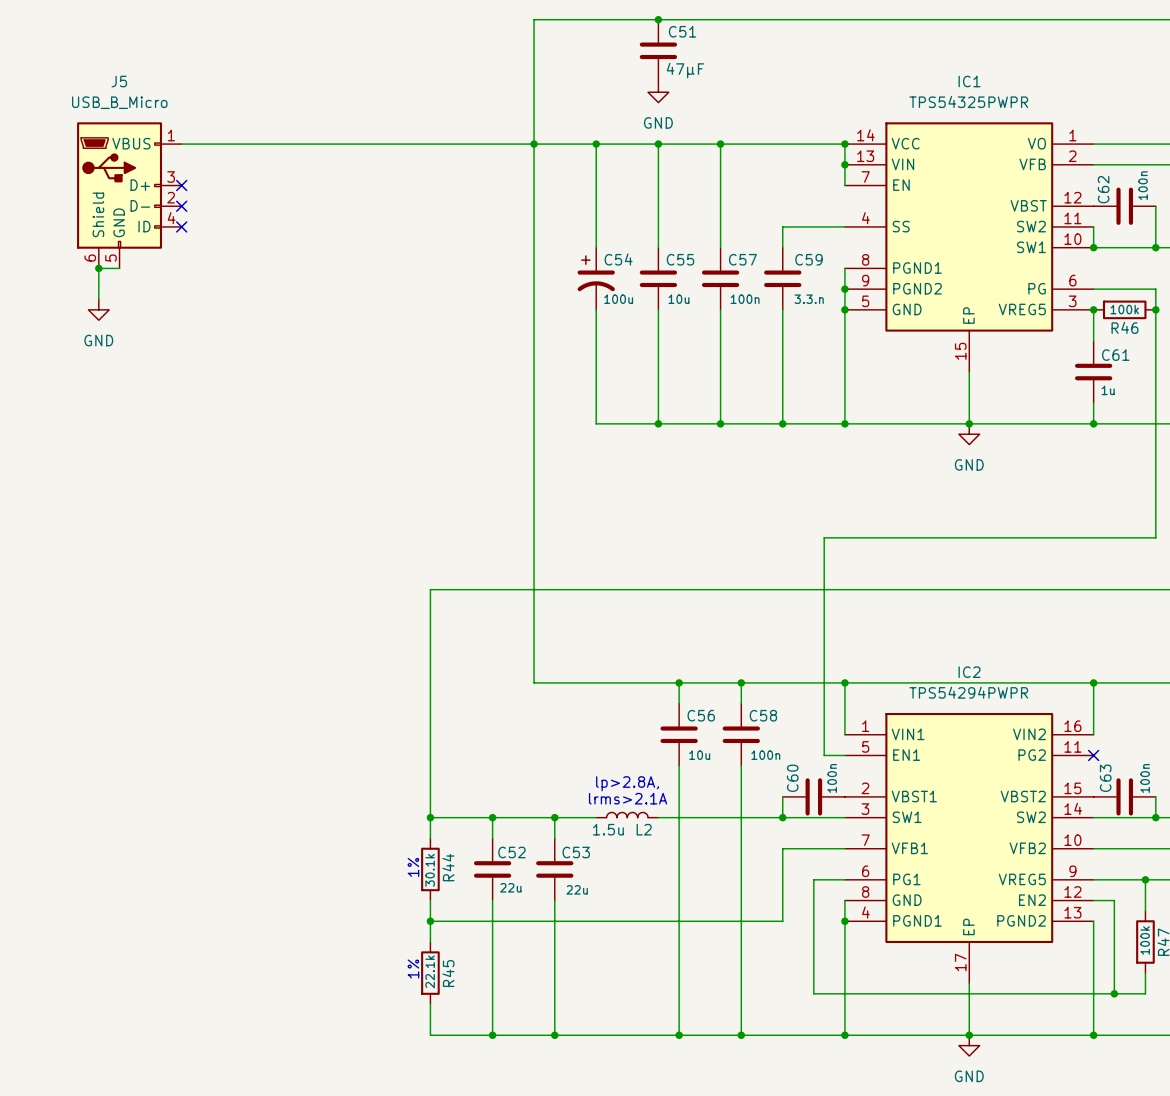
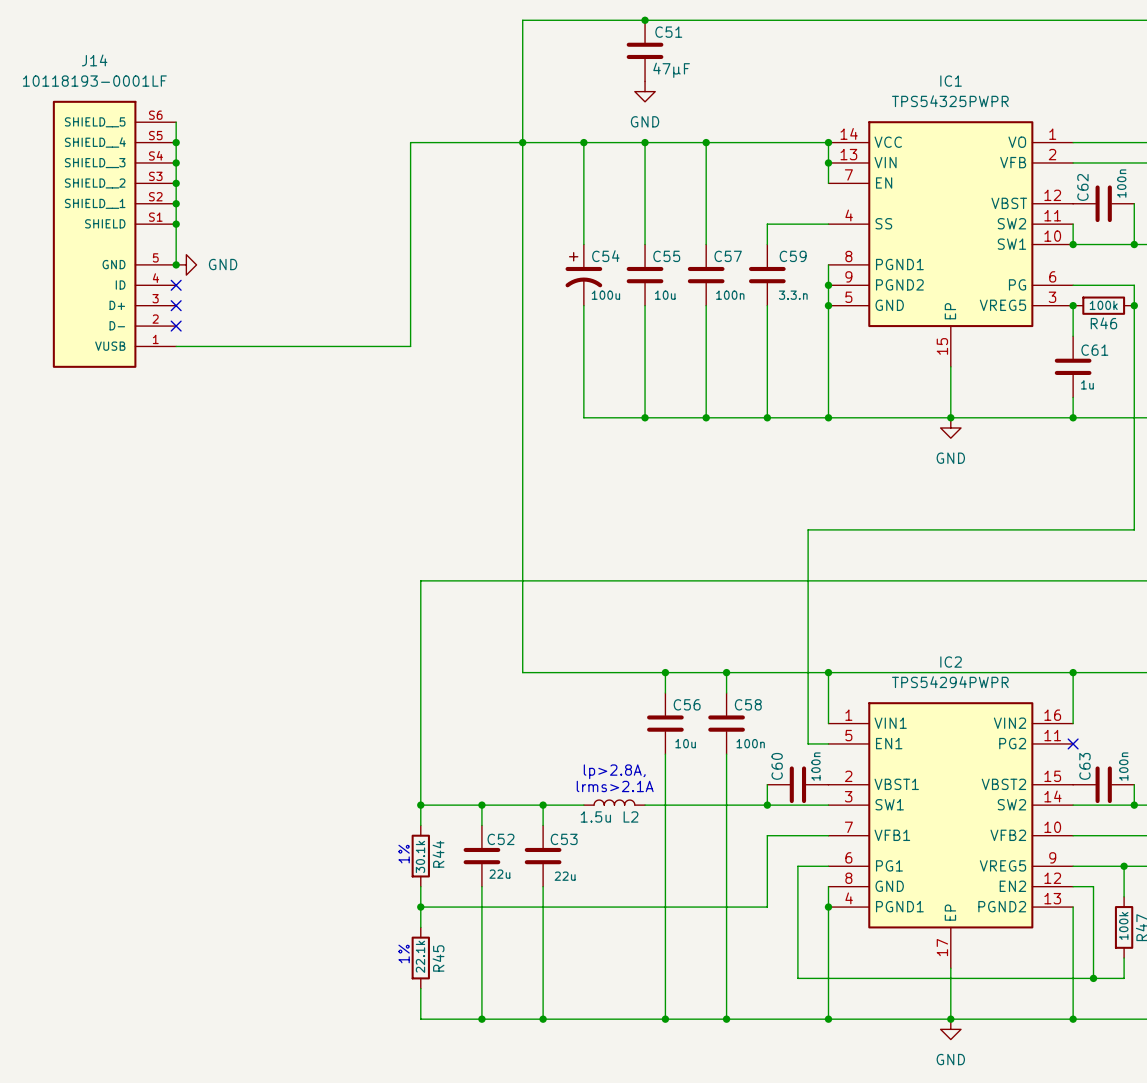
wire: none -> (176, 122) (176, 264)
wire: (181, 144) (420, 144) -> (176, 346) (410, 346) (410, 142)
junction: none -> (176, 142)
junction: none -> (176, 162)
junction: none -> (176, 183)
no-connect mark: (181, 185) -> none
J5: USB_B_Micro (129, 195) -> none
junction: none -> (176, 203)
no-connect mark: (181, 206) -> none
junction: none -> (176, 224)
no-connect mark: (181, 226) -> none
J14: none -> 10118193-0001LF (114, 234)
junction: (98, 268) -> none
junction: none -> (176, 264)
no-connect mark: none -> (176, 285)
power symbol rotation: 0° (98, 309) -> 90° counterclockwise (186, 264)
power symbol position: GND (98, 309) -> GND (186, 264)
no-connect mark: none -> (176, 305)
no-connect mark: none -> (176, 326)

